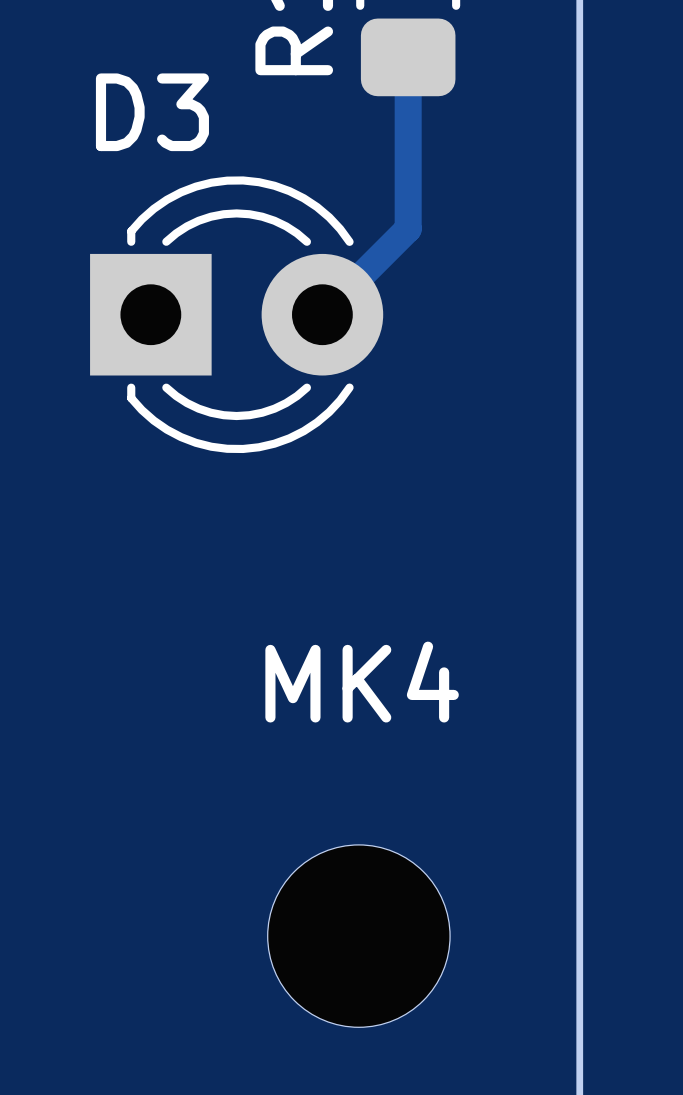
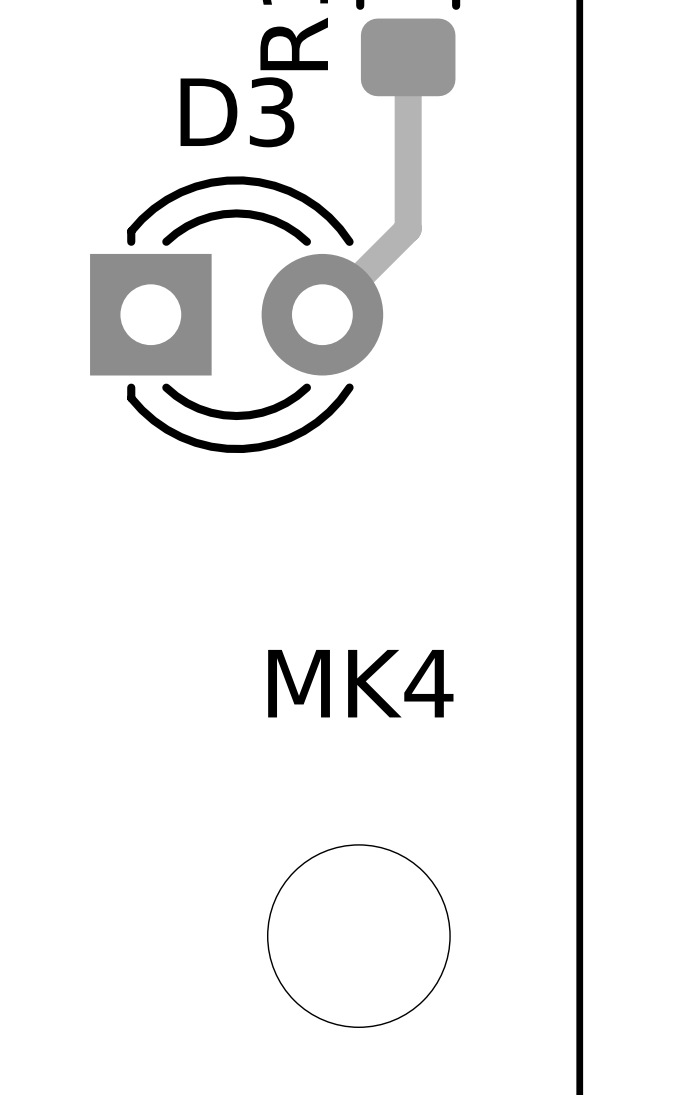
D3 name position: D3 (152, 112) -> D3 (237, 112)

